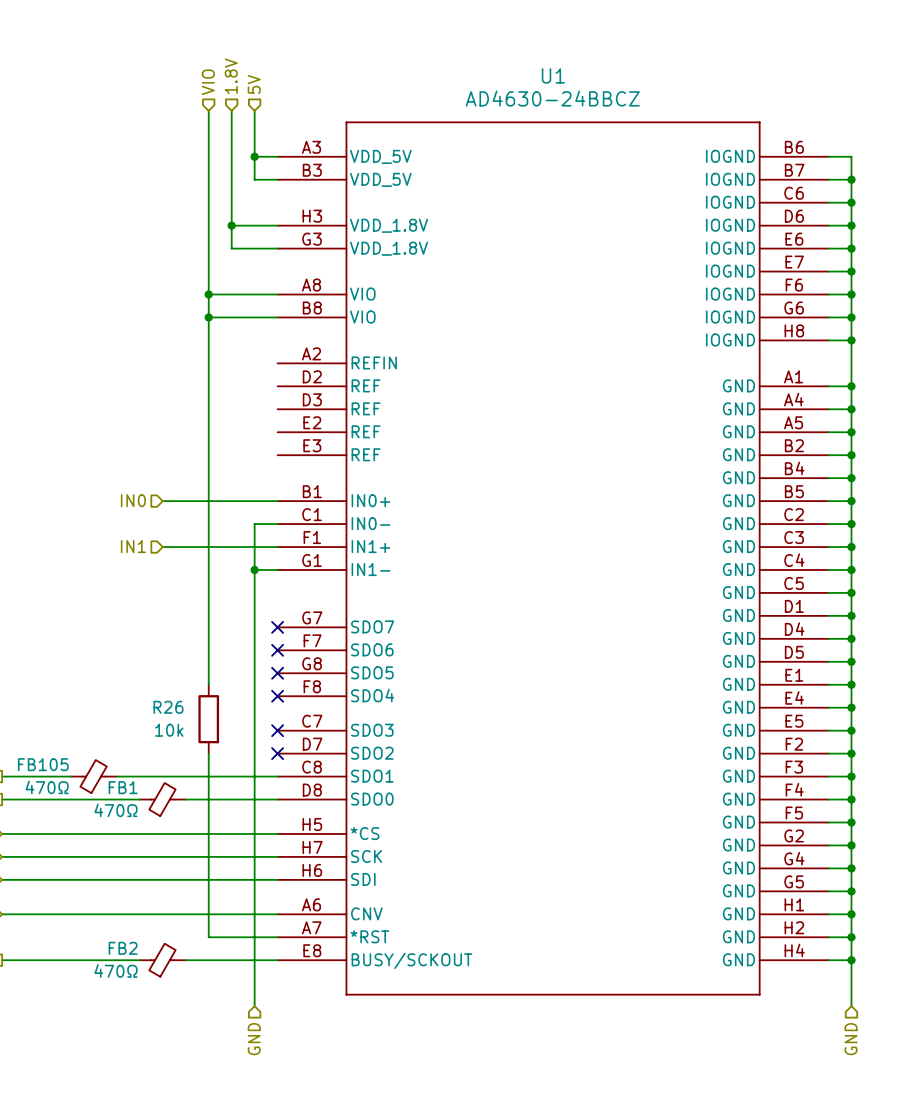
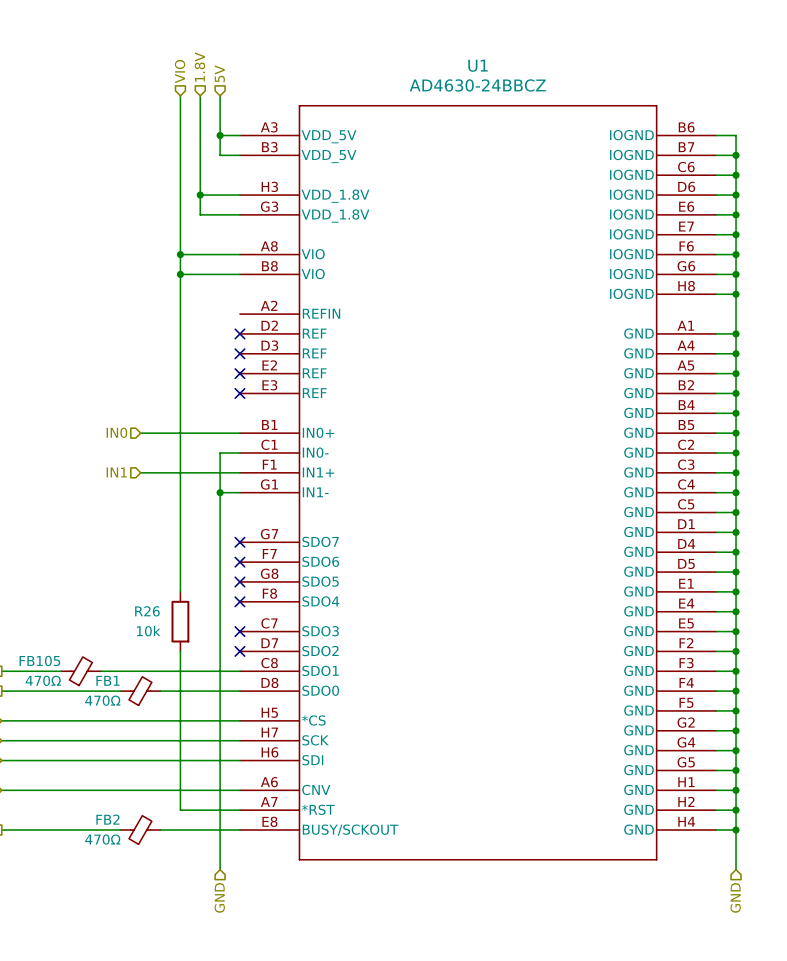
no-connect mark: none -> (239, 333)
no-connect mark: none -> (239, 353)
no-connect mark: none -> (239, 373)
no-connect mark: none -> (239, 393)

